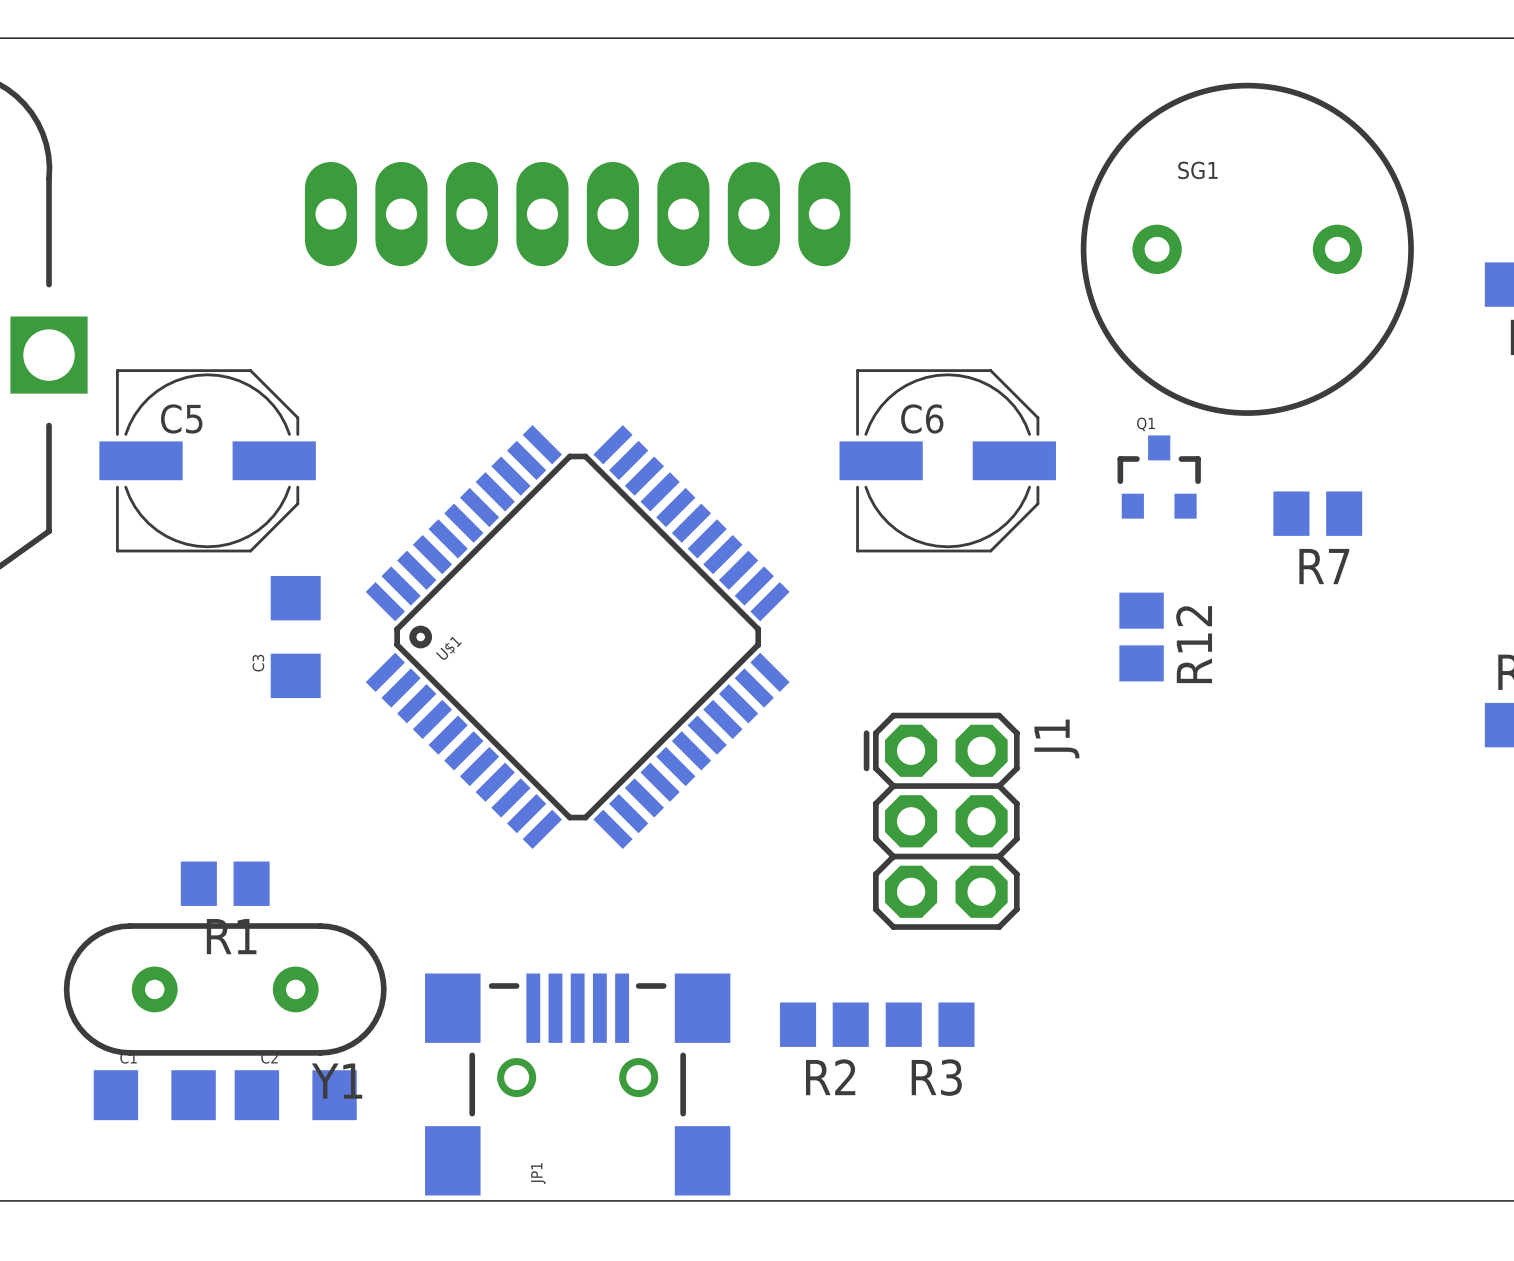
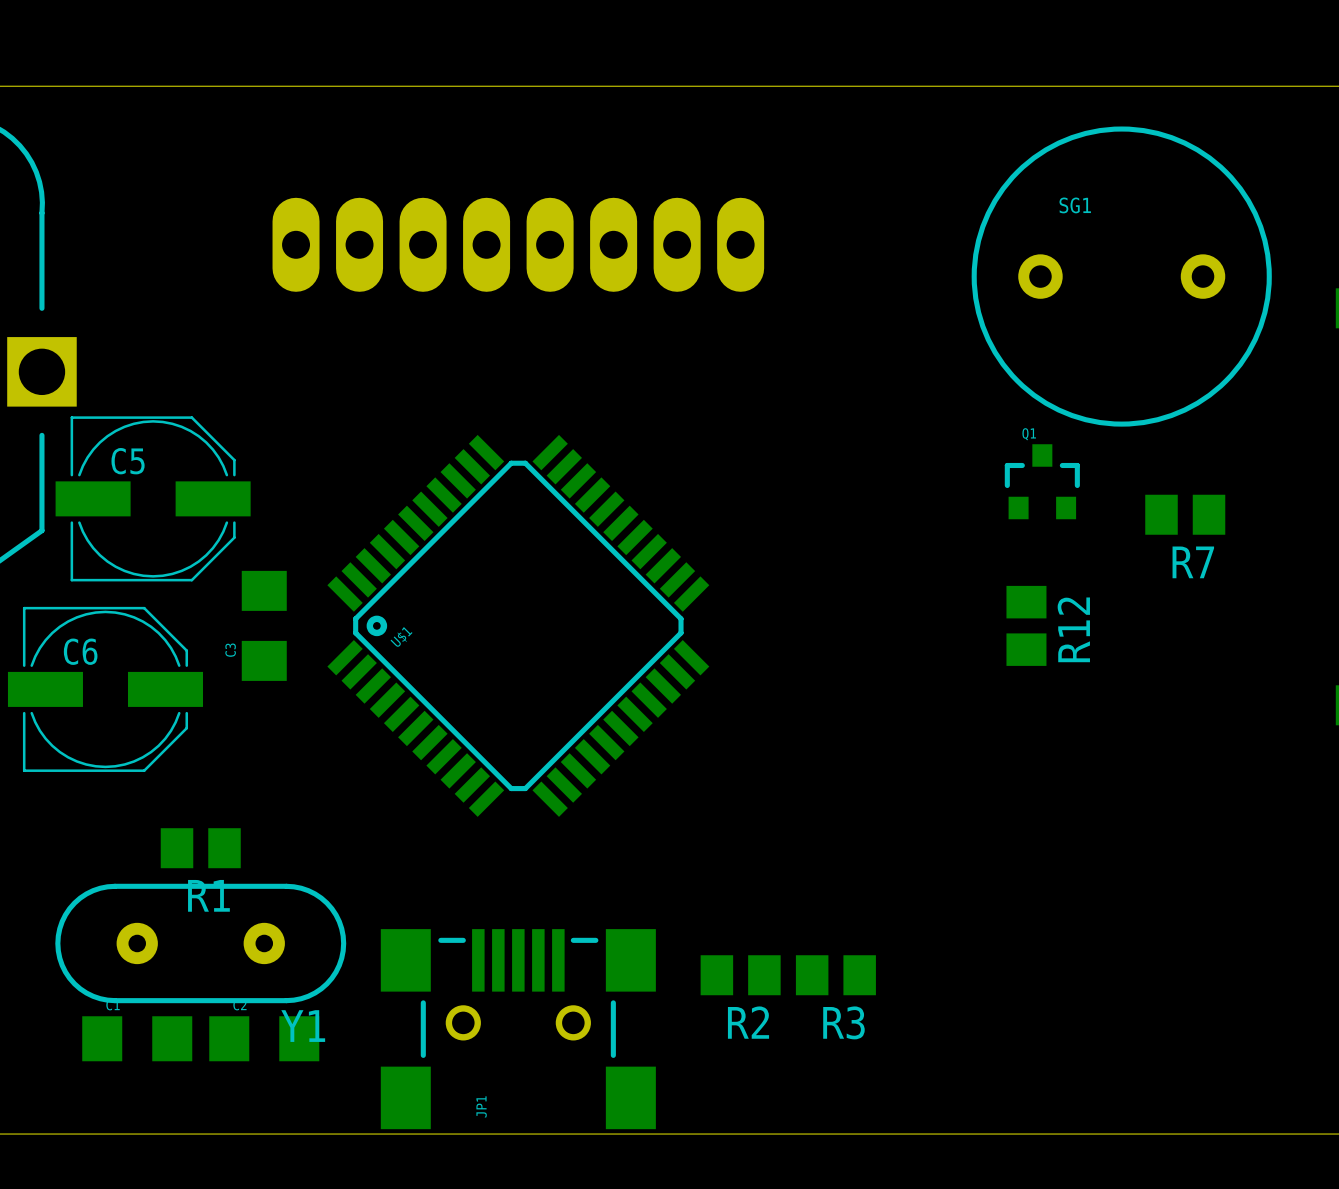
C5 position: (207, 460) -> (153, 498)
C6 position: (947, 460) -> (105, 689)
J1: (941, 821) -> none

